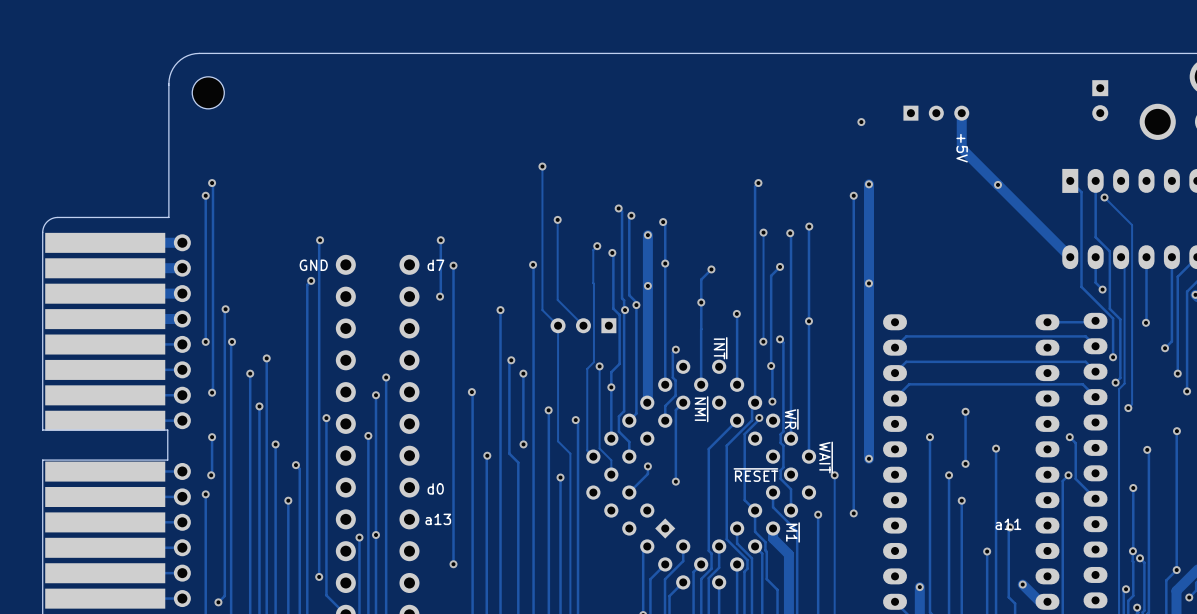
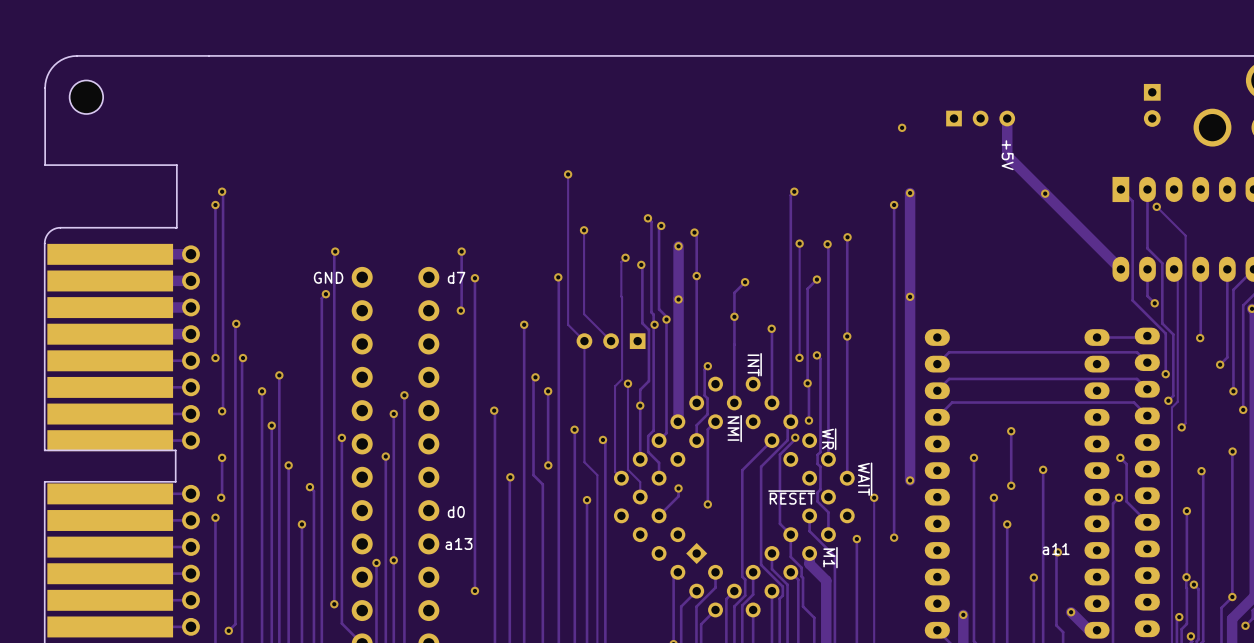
board edge: (199, 53) (191, 54) (180, 59) (175, 65) (169, 76) (168, 157) -> (208, 55) (72, 56) (57, 62) (51, 68) (46, 79) (45, 165) (176, 165)
part position: (208, 92) -> (86, 97)

